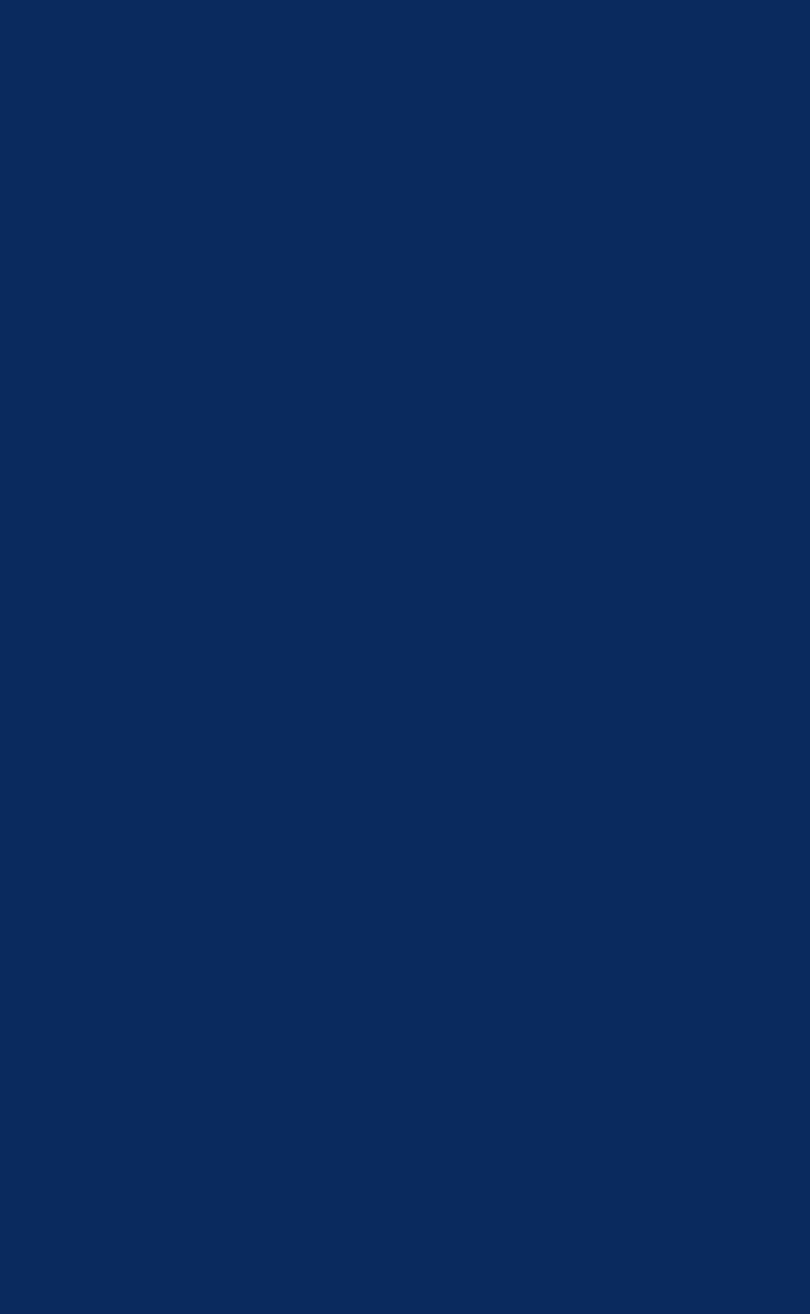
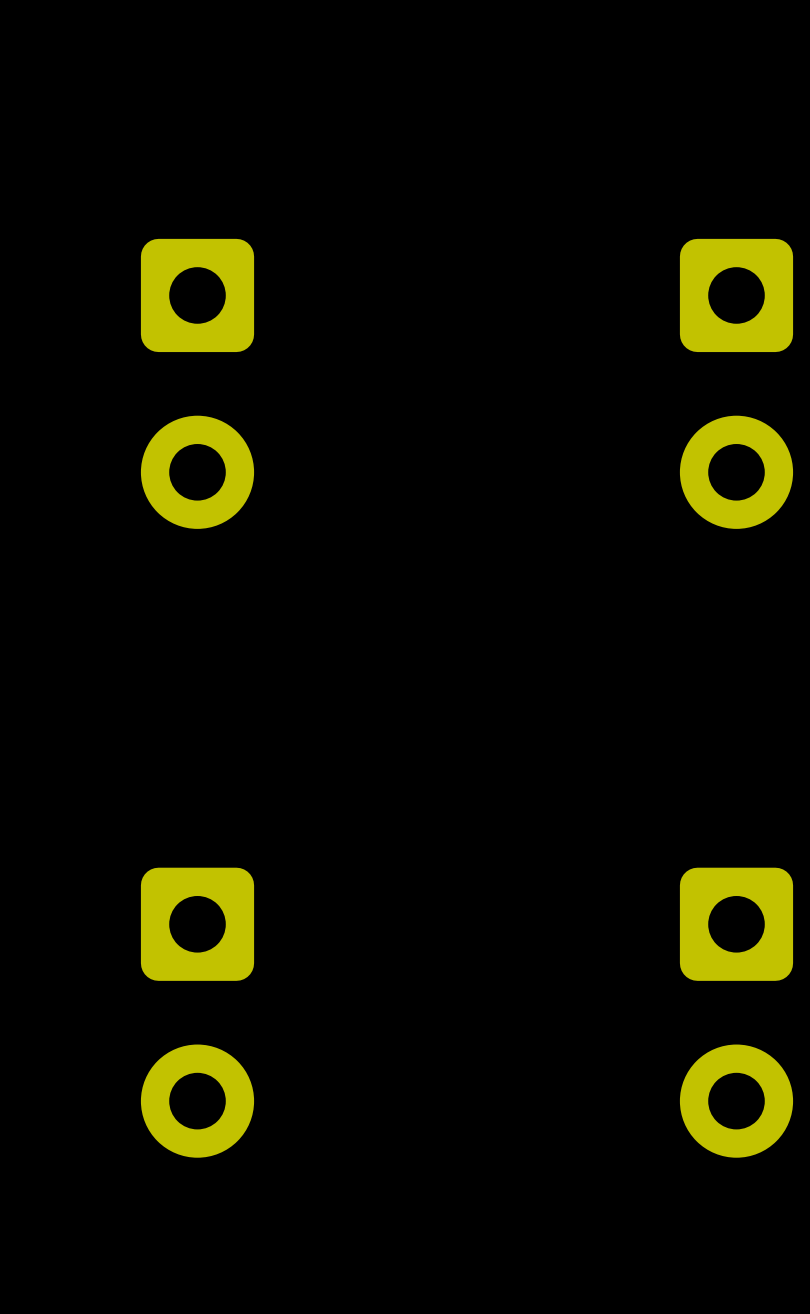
part: none -> (197, 383)
part: none -> (736, 383)
part: none -> (197, 1012)
part: none -> (736, 1012)

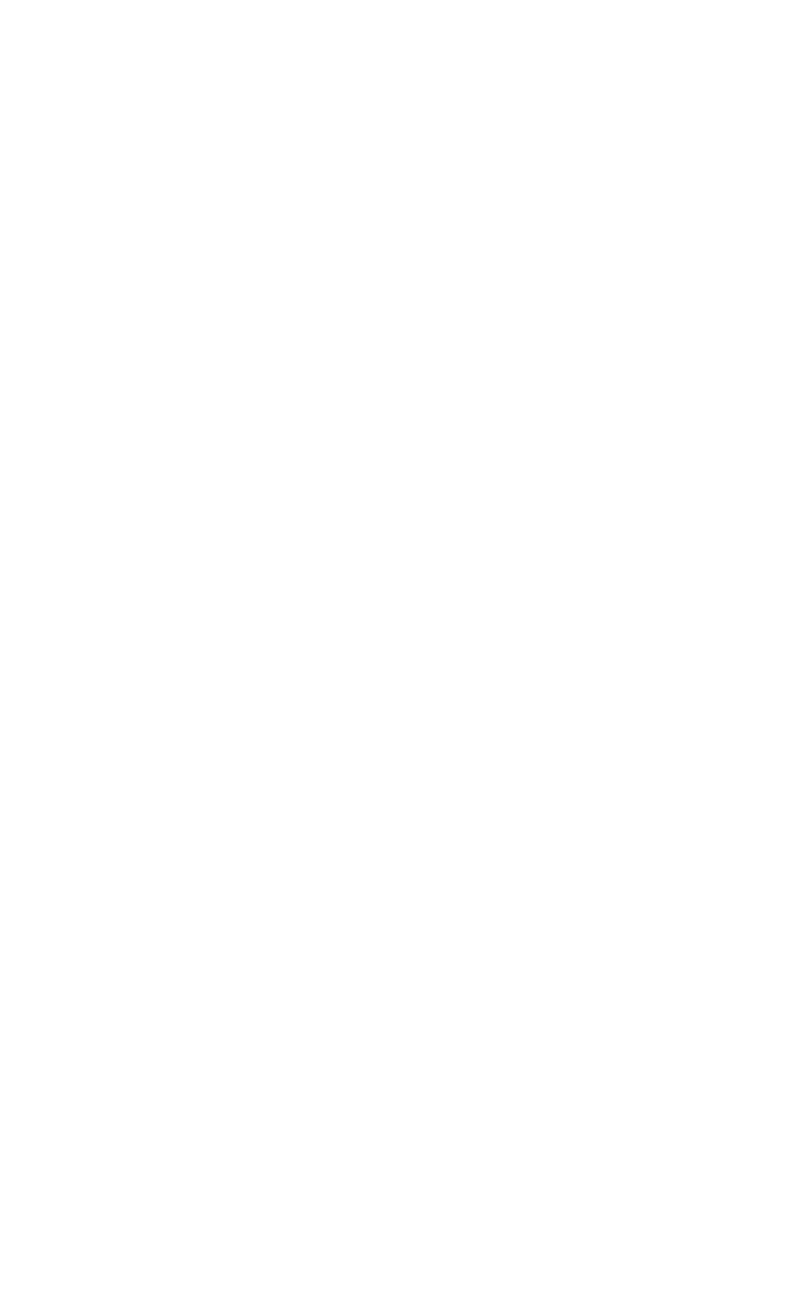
part: (197, 383) -> none
part: (736, 383) -> none
part: (197, 1012) -> none
part: (736, 1012) -> none

